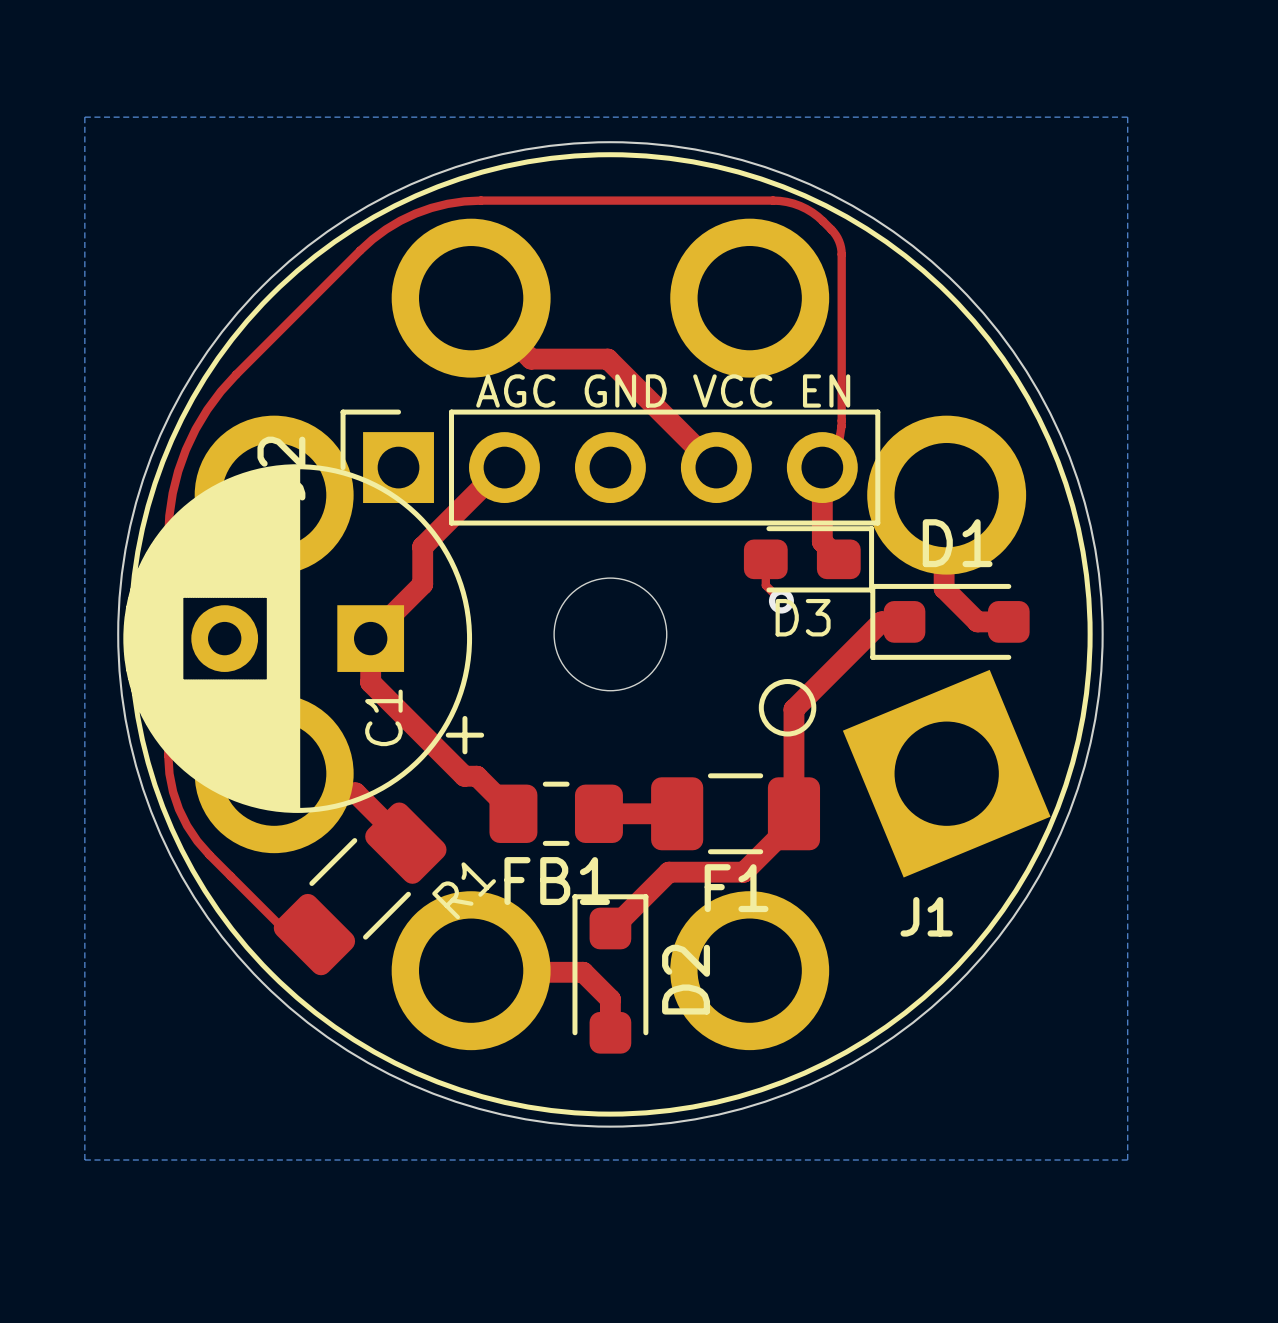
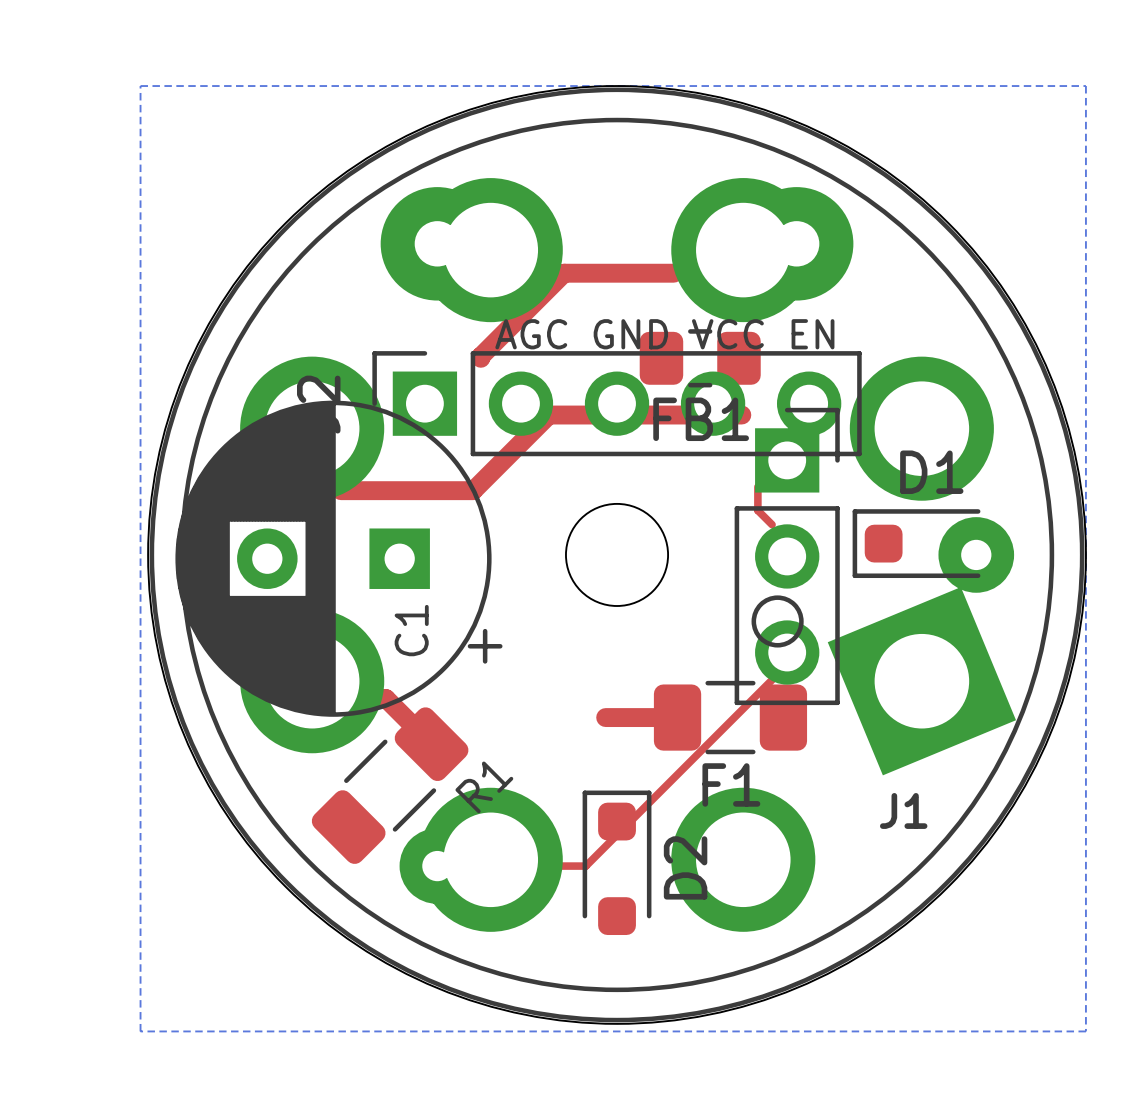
round board edge size: [117, 141, 1104, 1128] -> [147, 85, 1087, 1025]
top track: (472, 300) (531, 359) (607, 359) (716, 467) -> none
top track: none -> (673, 273) (564, 273) (480, 358)
top track: (504, 467) (501, 467) (422, 546) (422, 584) (372, 634) (372, 638) -> none
top track: none -> (741, 415) (548, 415) (473, 490) (340, 490)
top track: (944, 525) (944, 588) (977, 621) (1008, 621) -> none
D3: (808, 559) -> none
top track: (839, 559) (822, 541) (822, 467) (836, 446) (841, 426) (841, 250) (833, 232) (812, 212) (793, 203) (773, 200) (480, 200) (447, 203) (431, 207) (415, 213) (386, 229) (360, 250) (220, 391) (195, 429) (185, 449) (178, 471) (169, 515) (168, 755) (173, 791) (187, 825) (209, 855) (285, 930) (305, 930) -> none
via: (781, 601) -> none
top track: (904, 621) (881, 621) (793, 709) (793, 822) (743, 872) (668, 872) (610, 930) -> none
part: none -> (617, 554)
part: none -> (787, 556)
top track: (370, 638) (370, 682) (464, 776) (476, 776) (514, 813) -> none
top track: none -> (799, 652) (585, 866) (437, 866)
FB1 position: (556, 813) -> (700, 358)
top track: (522, 972) (583, 972) (610, 999) (610, 1032) -> none

